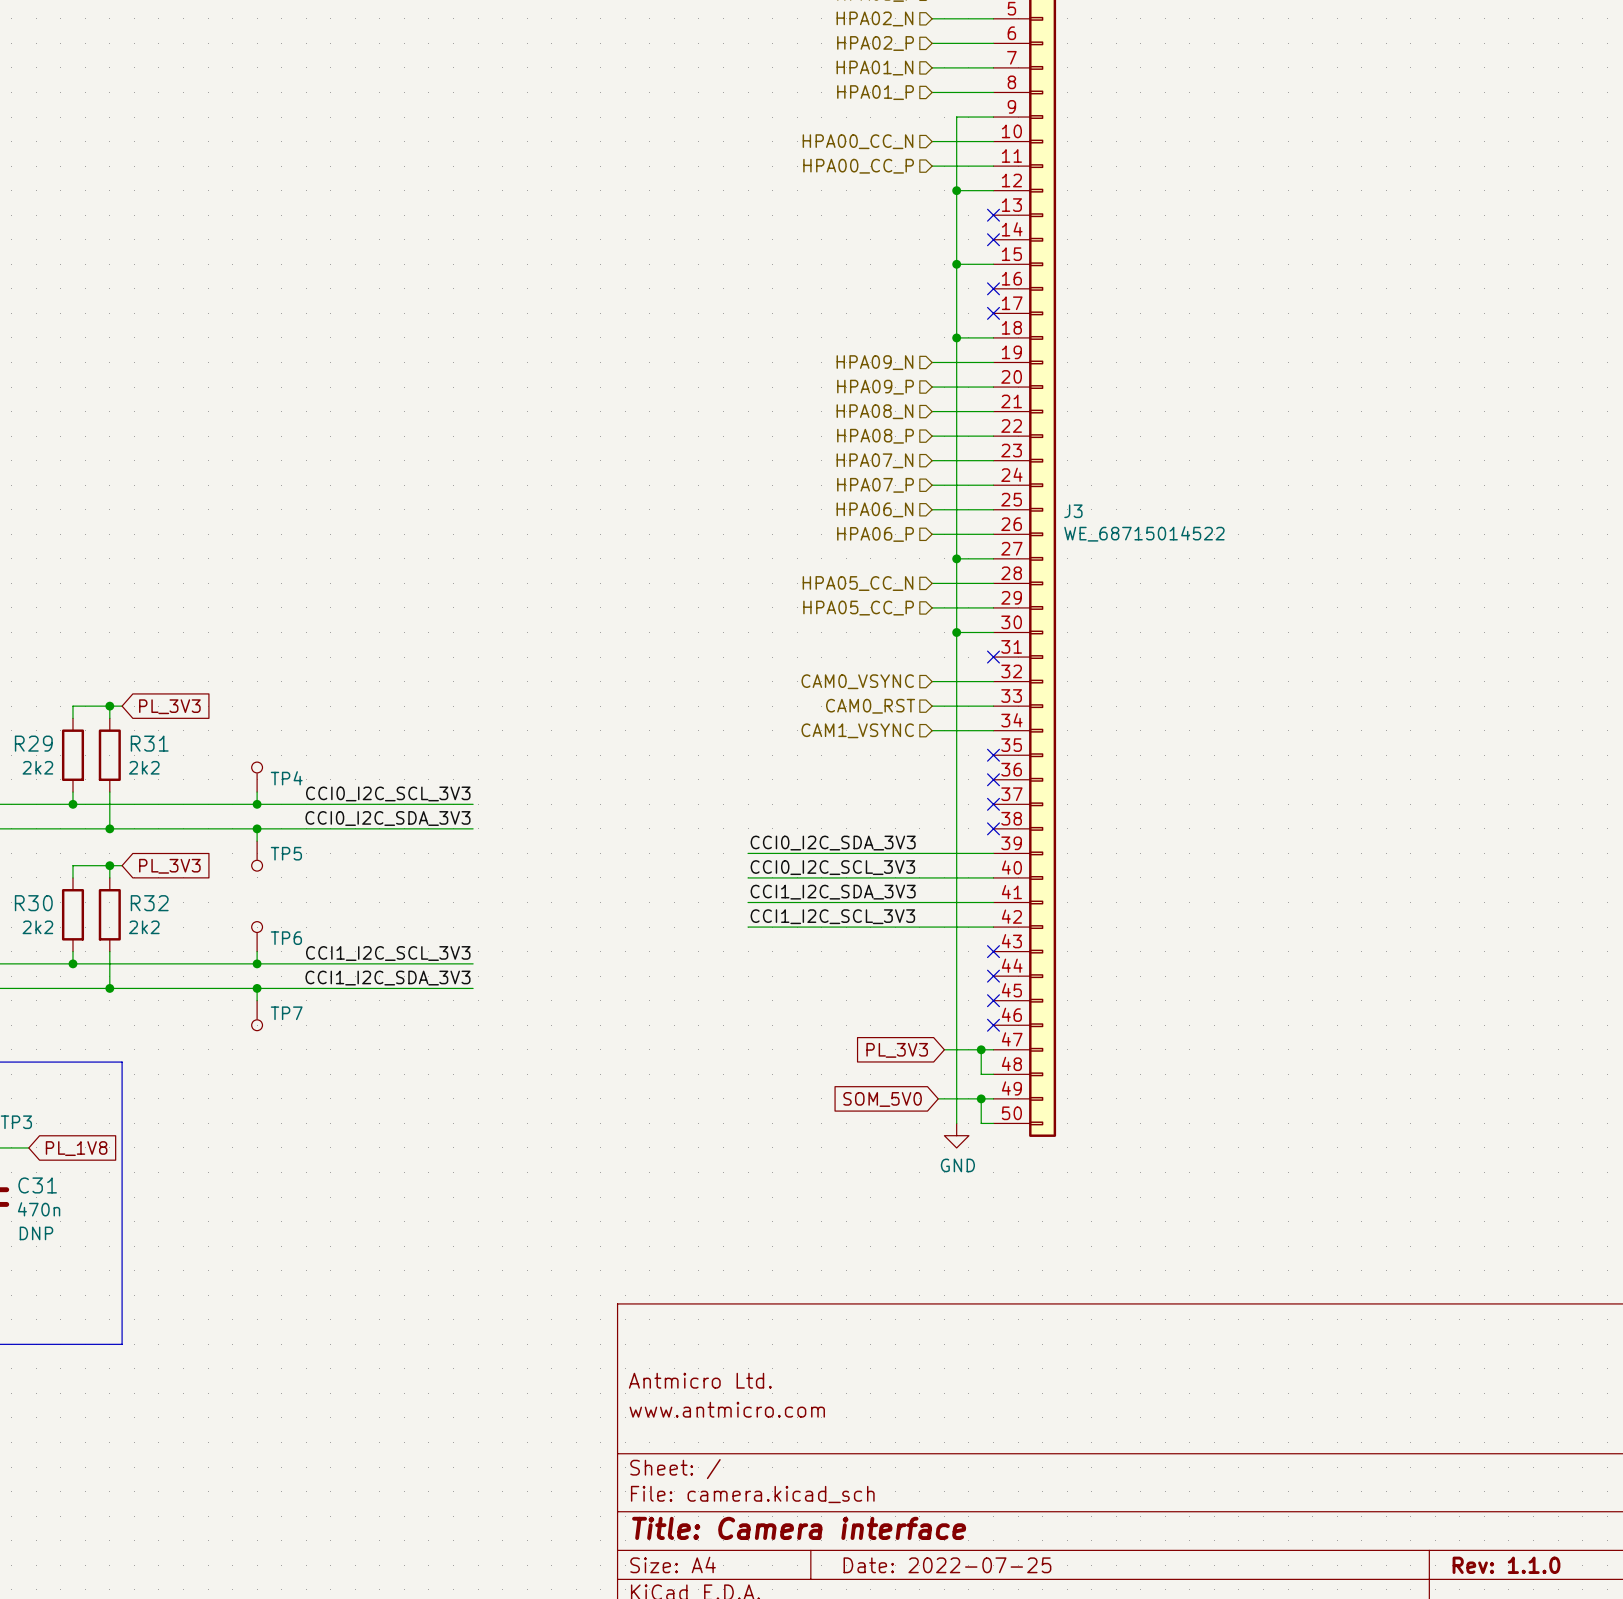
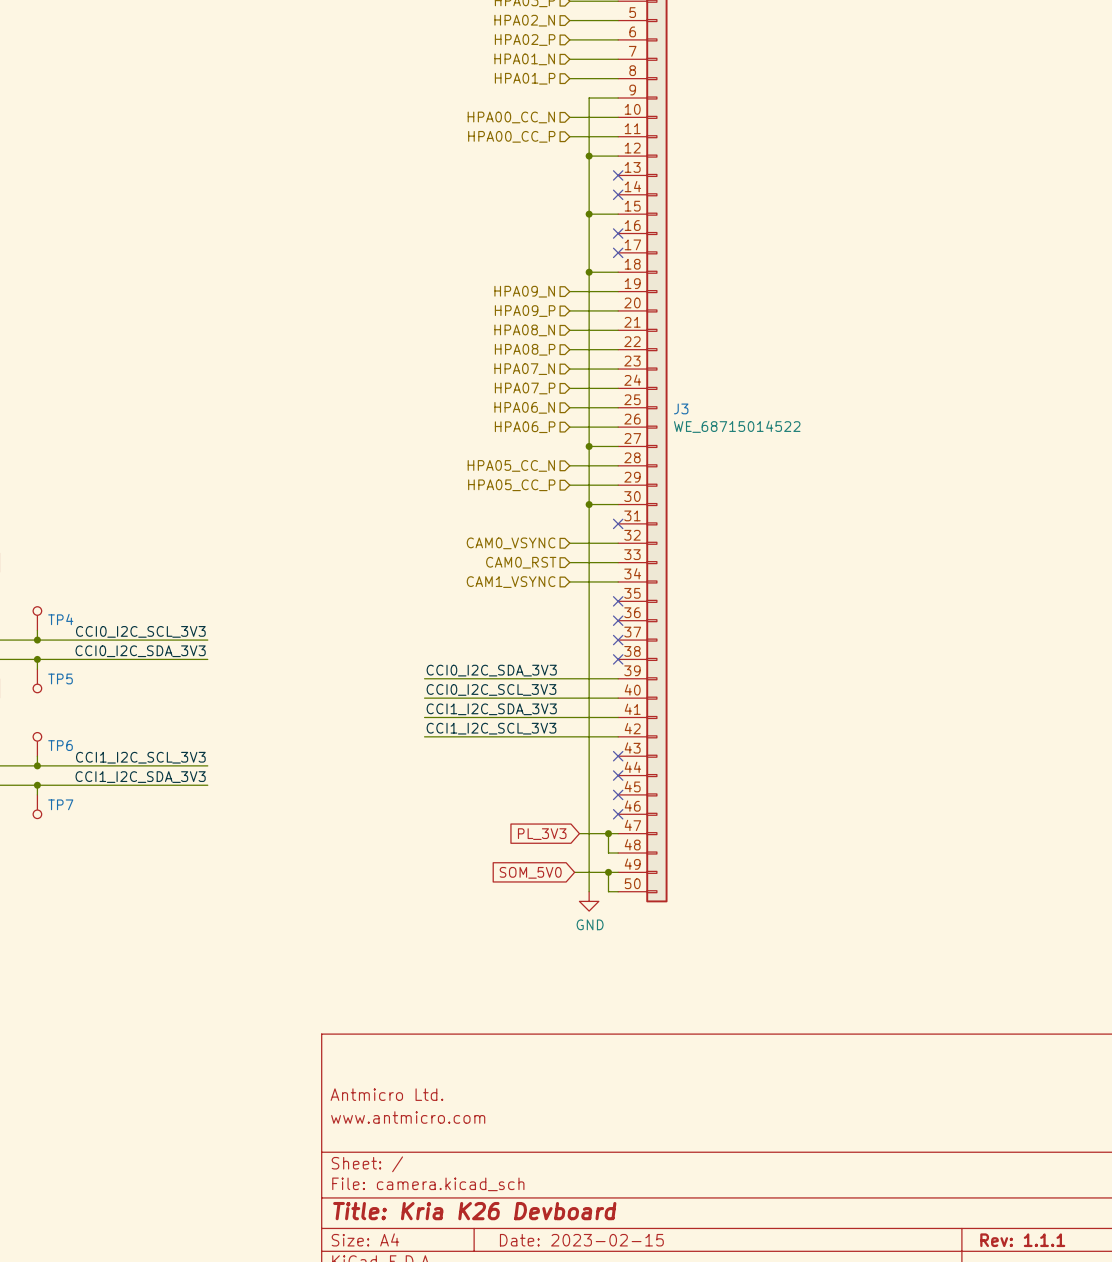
title block: Title: Camera interface (799, 1528) -> Title: Kria K26 Devboard (474, 1211)
title block: Date: 2022-07-25 (947, 1565) -> Date: 2023-02-15 (581, 1240)
title block: Rev: 1.1.0 (1506, 1565) -> Rev: 1.1.1 (1022, 1240)

